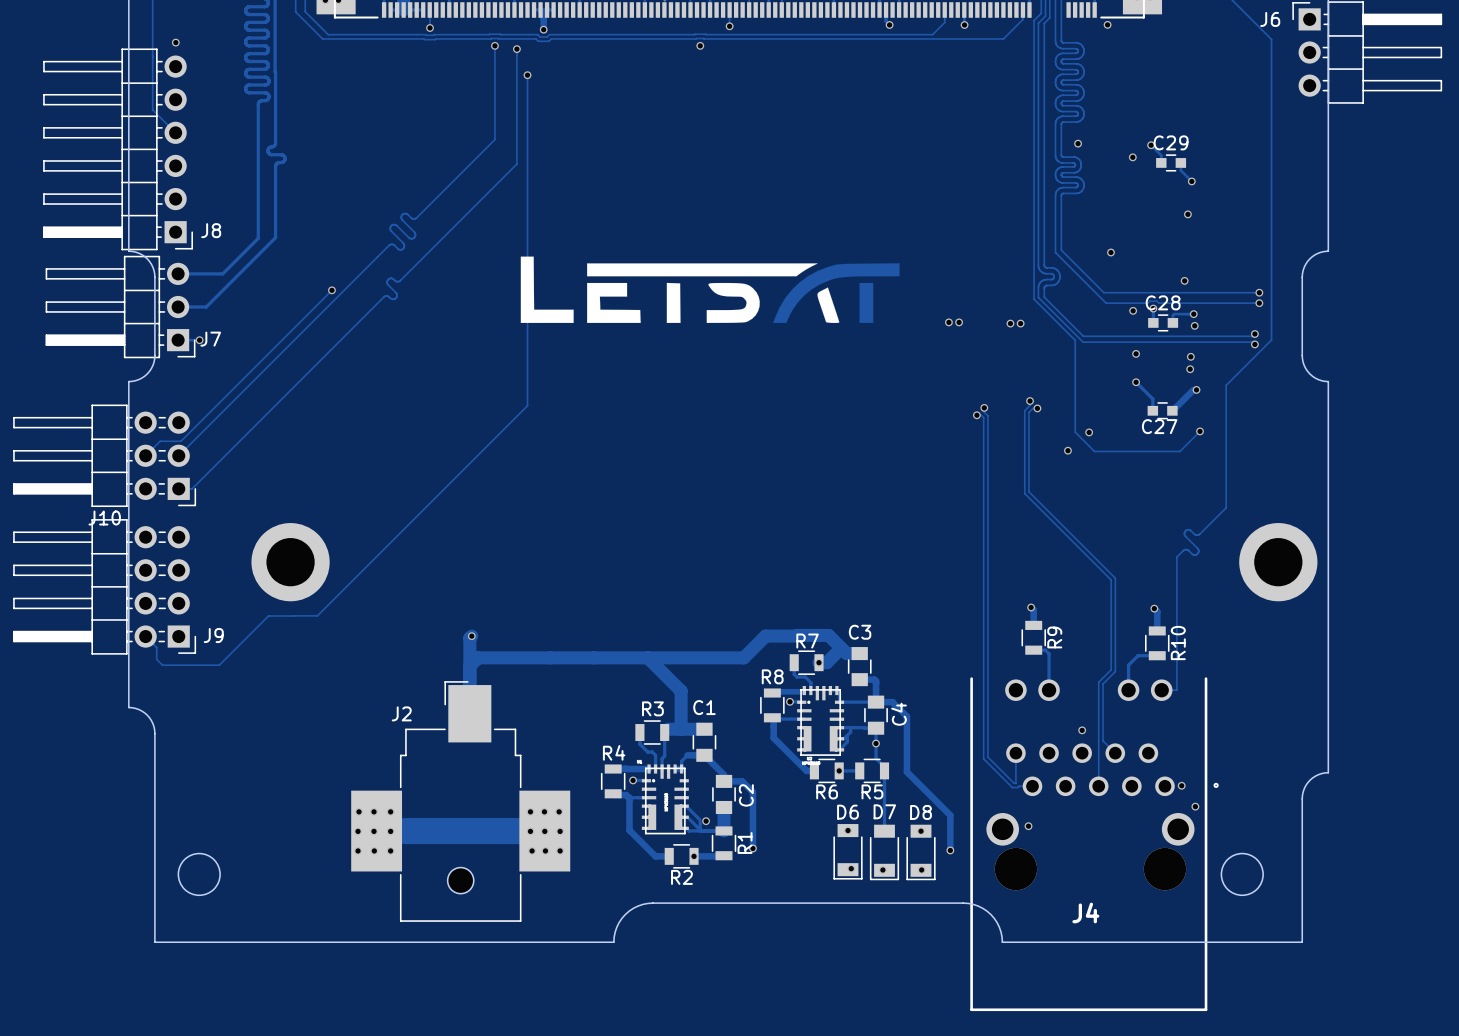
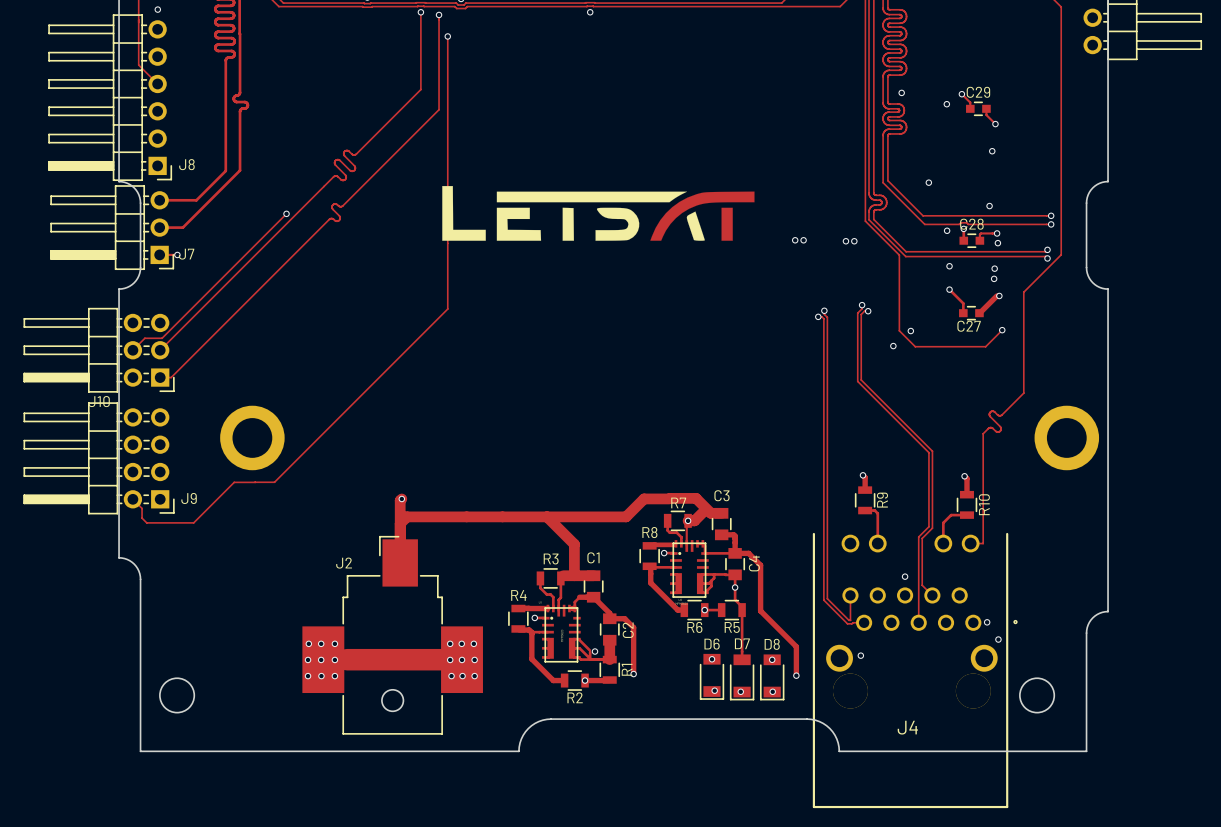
track: none -> (688, 520) (686, 545)

